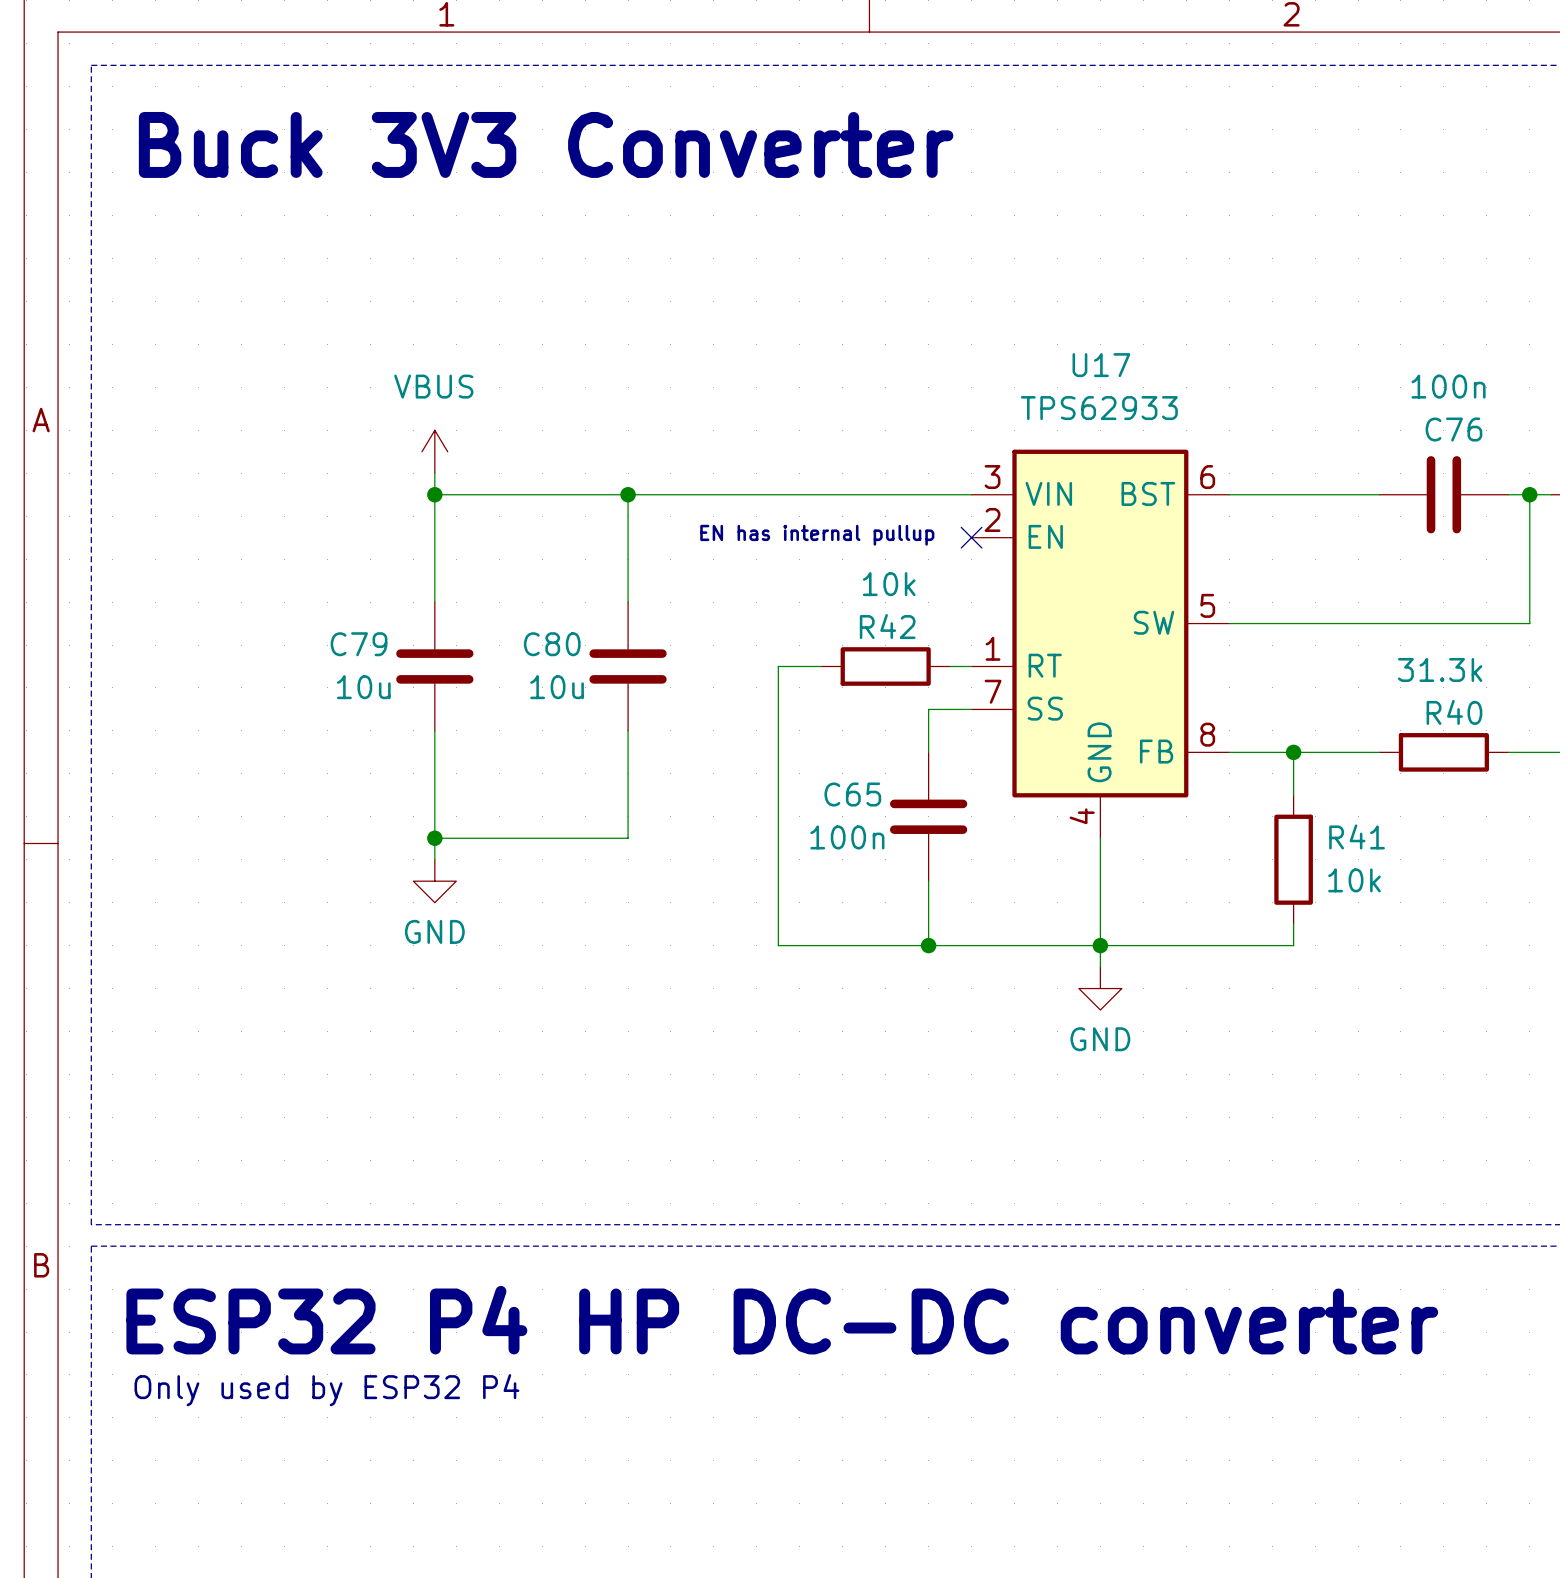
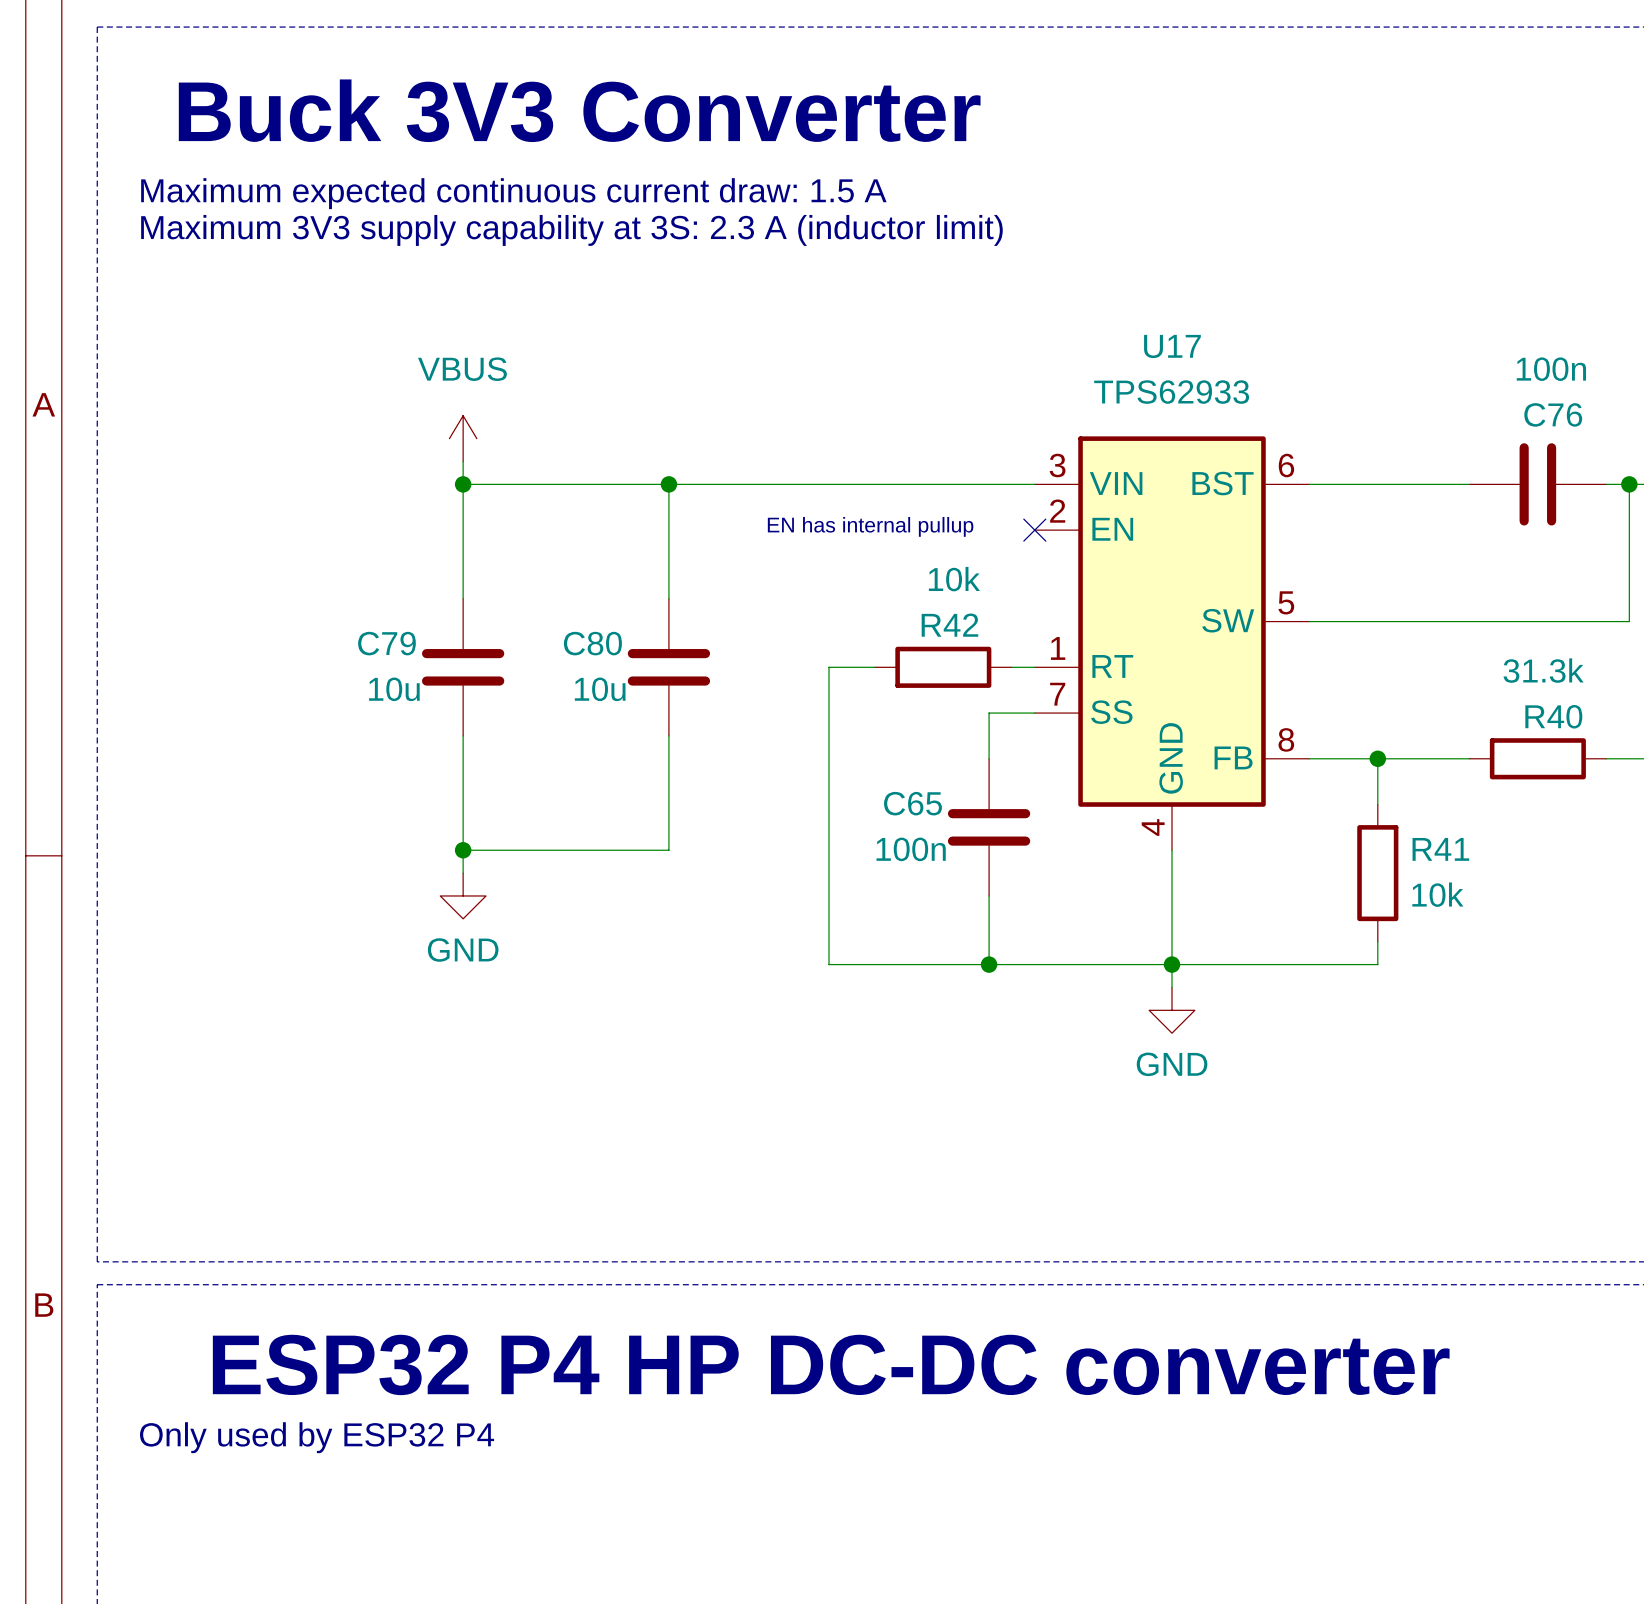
text: none -> Maximum expected continuous current draw: 1.5 A (513, 193)
text: none -> Maximum 3V3 supply capability at 3S: 2.3 A (inductor limit) (571, 230)

